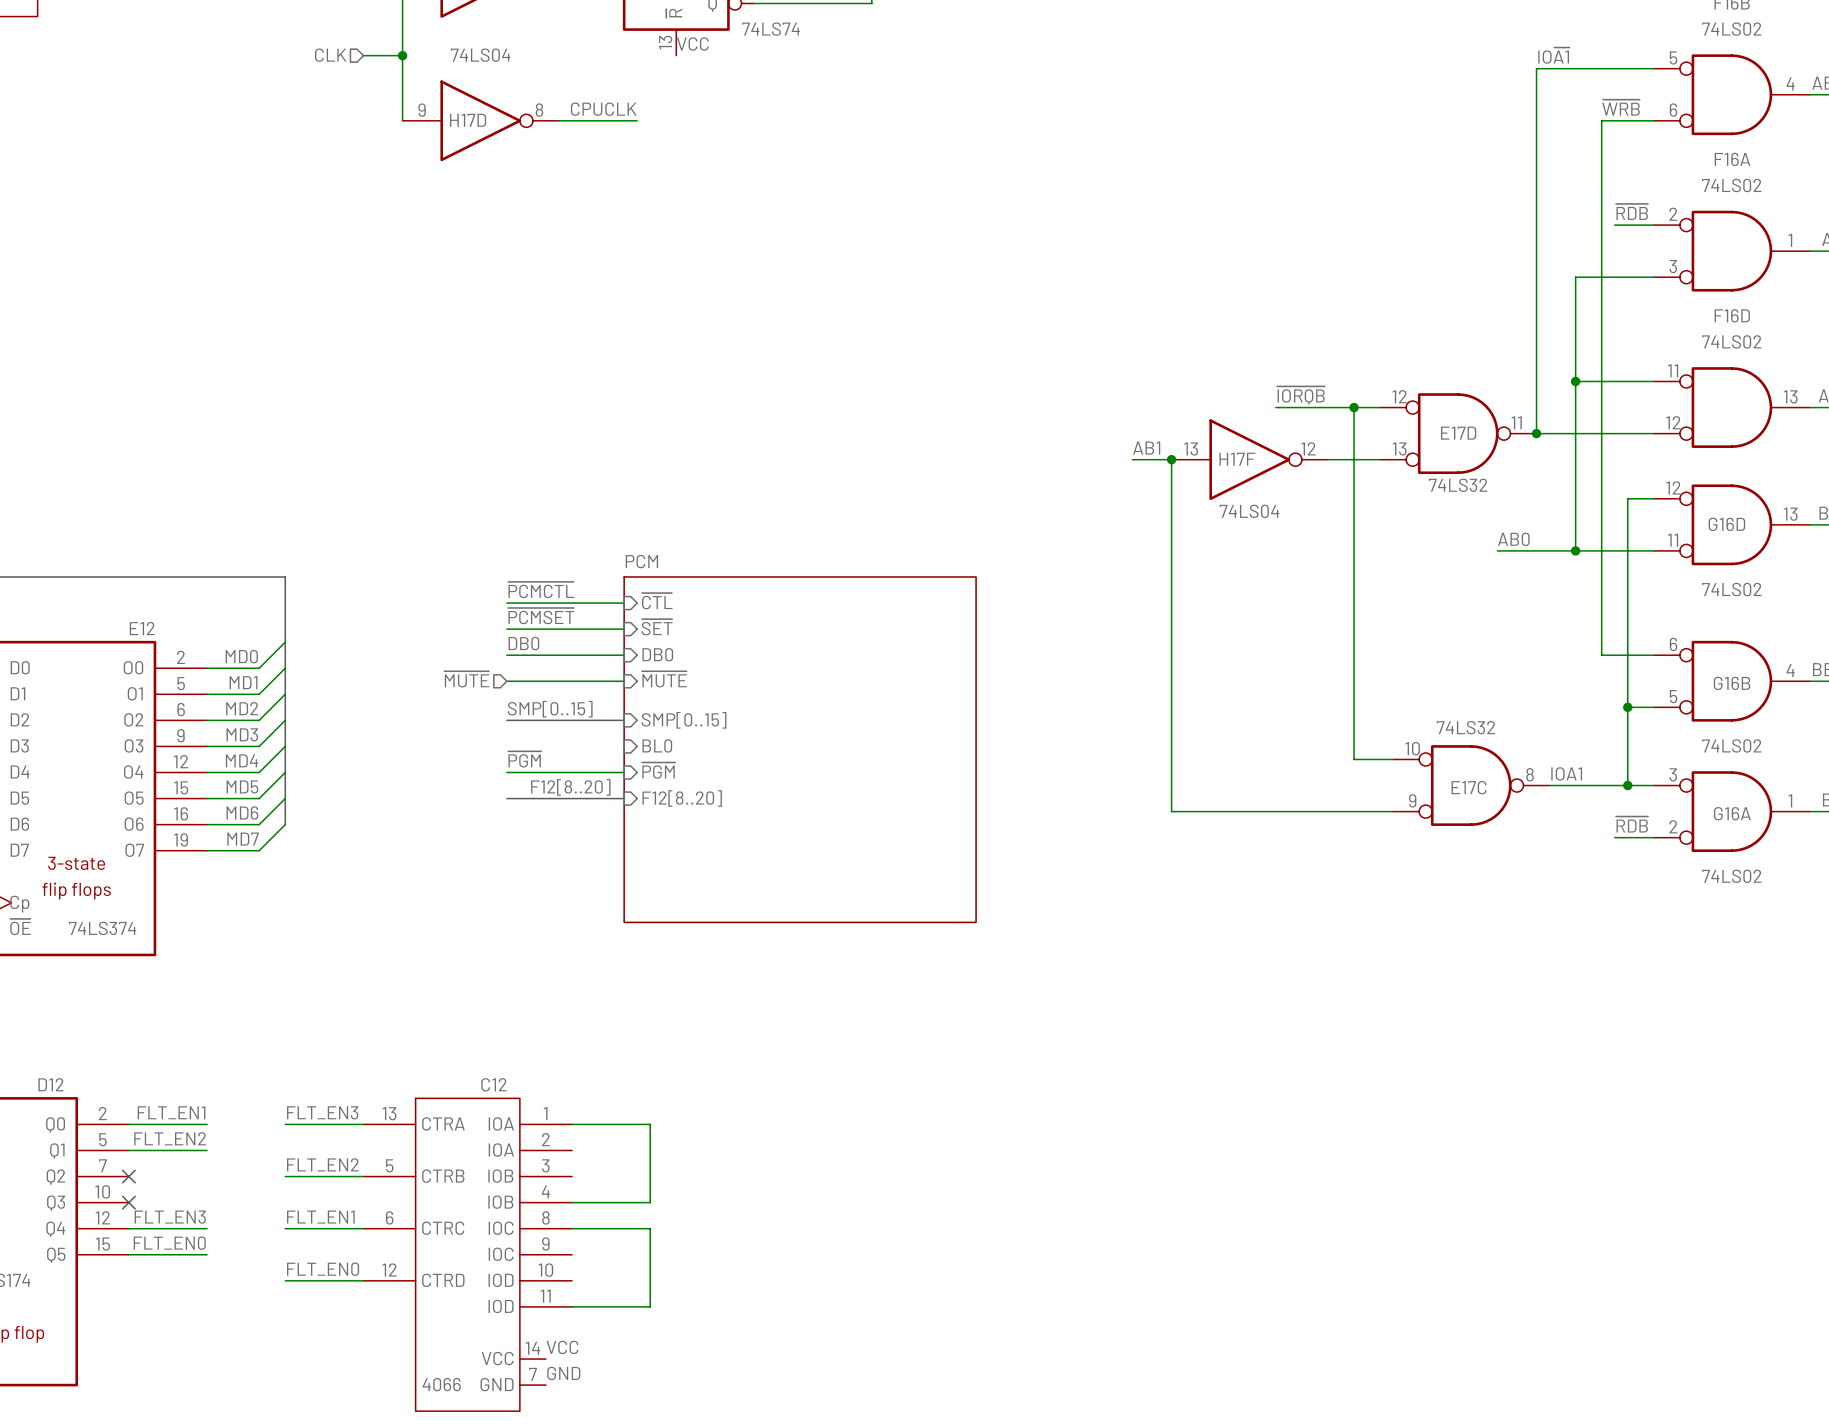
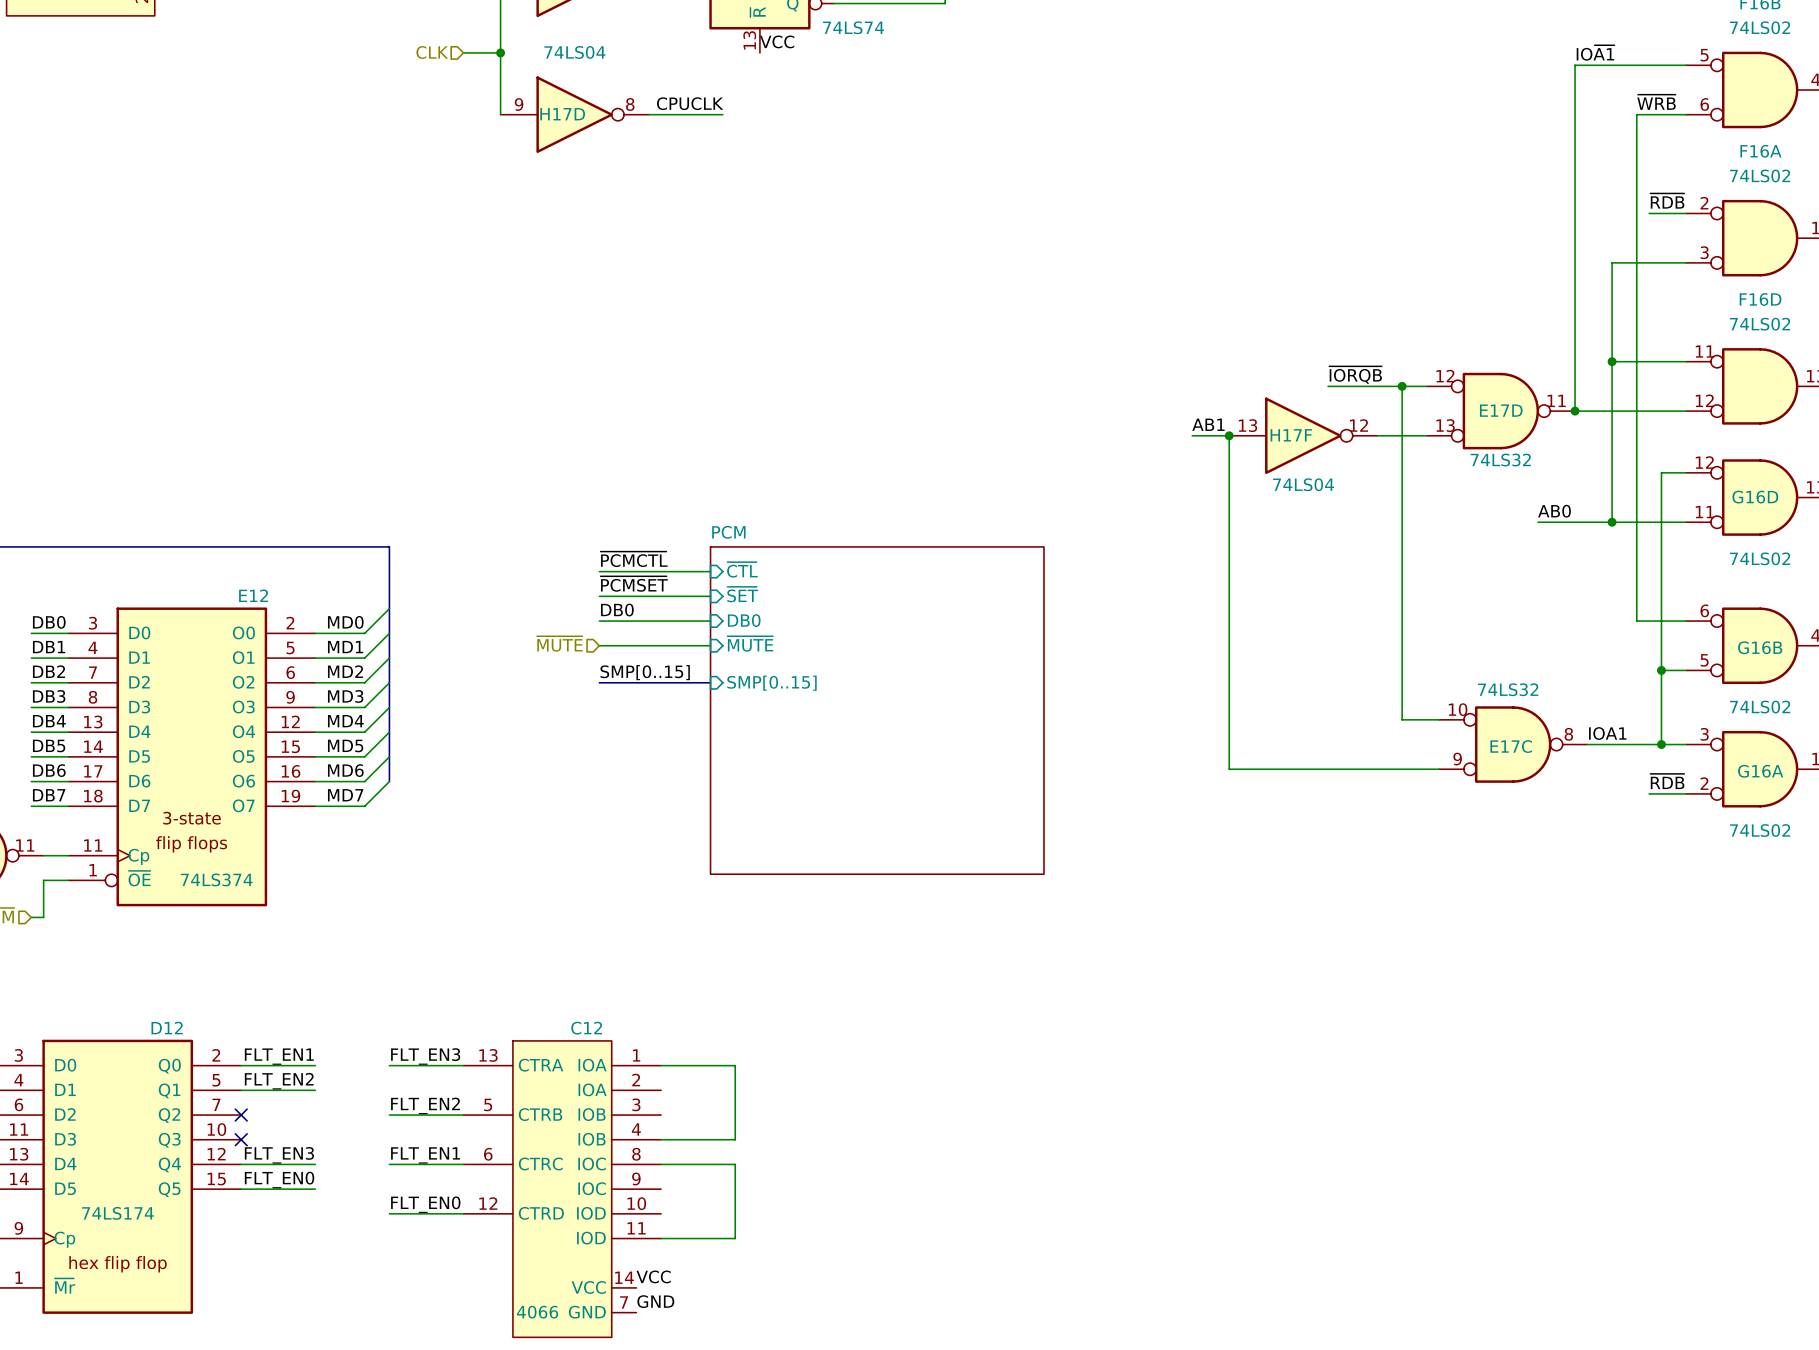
sheet pin: BL0 (657, 745) -> none
label: ~{PGM} (524, 759) -> none
sheet pin: ~{PGM} (658, 770) -> none
wire: (506, 772) (624, 772) -> none
label: F12[8..20] (570, 787) -> none
bus: (506, 798) (624, 798) -> none
sheet pin: F12[8..20] (682, 798) -> none

